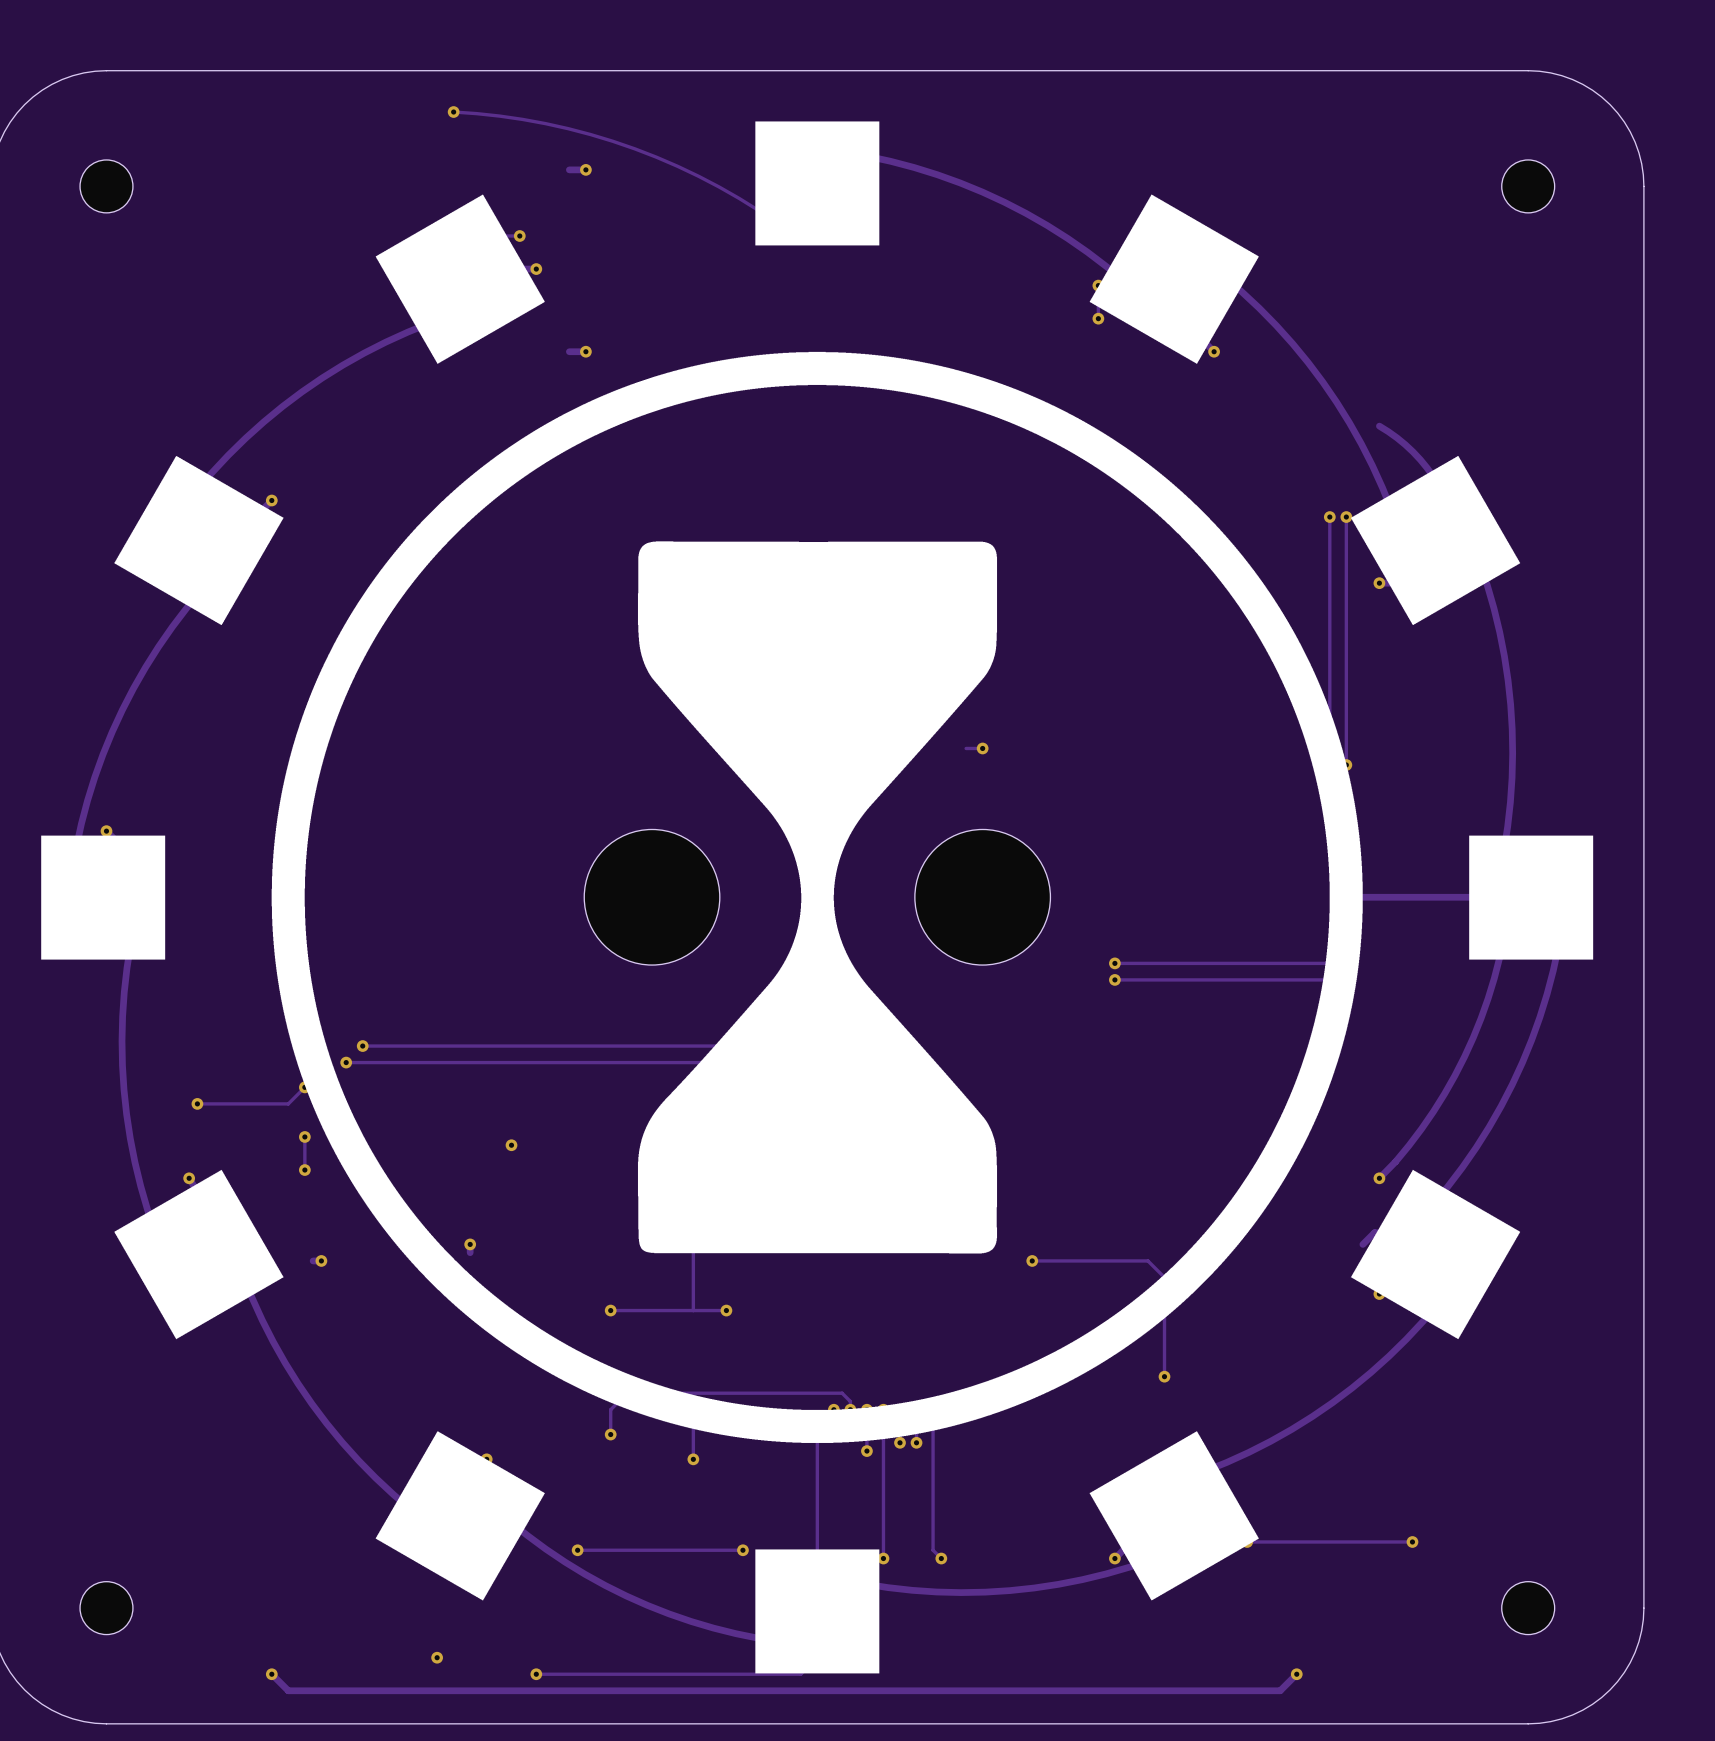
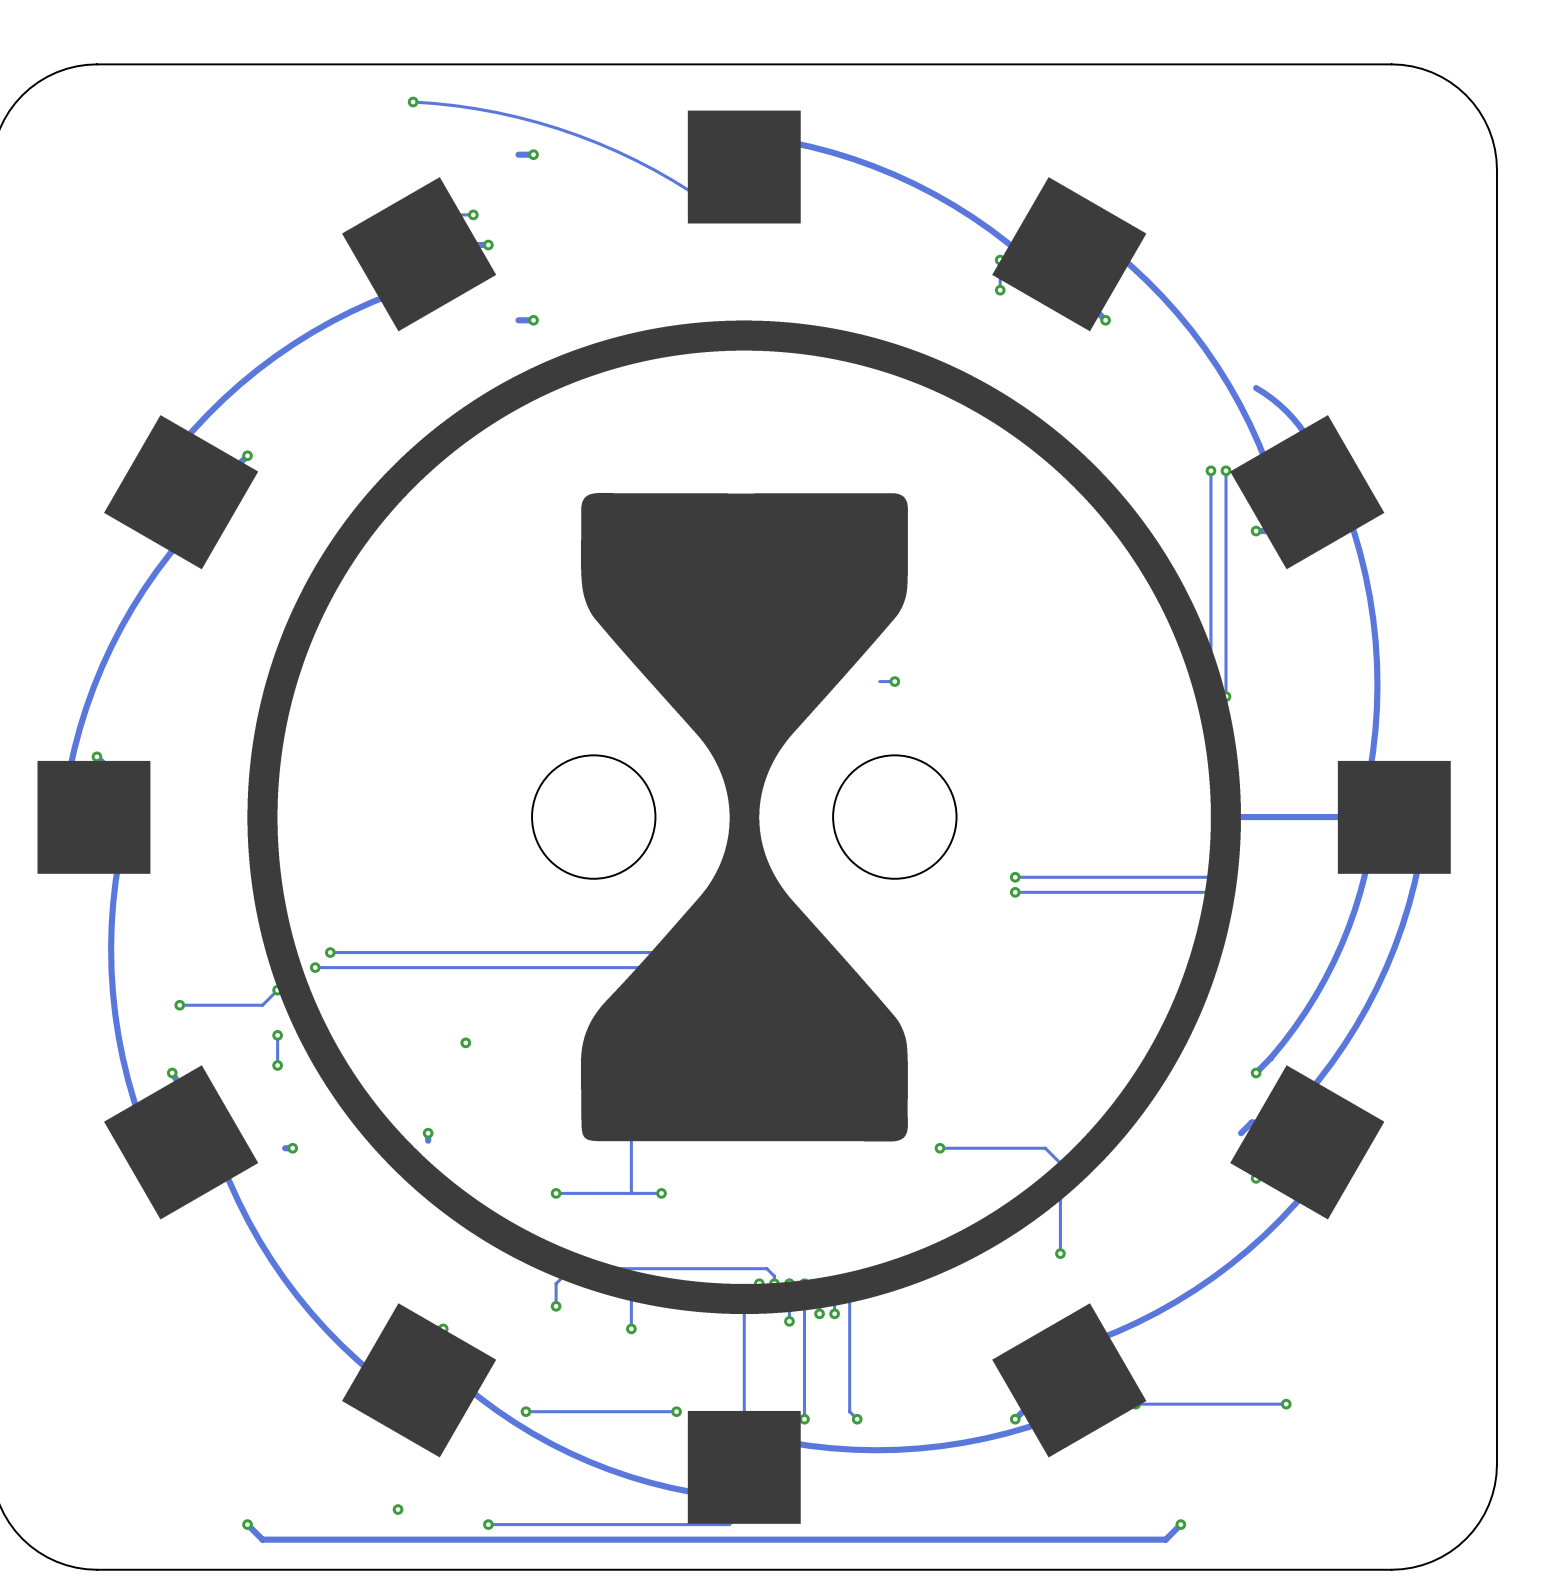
hole: (106, 186) -> none
hole: (1528, 186) -> none
hole: (106, 1608) -> none
hole: (1528, 1608) -> none

